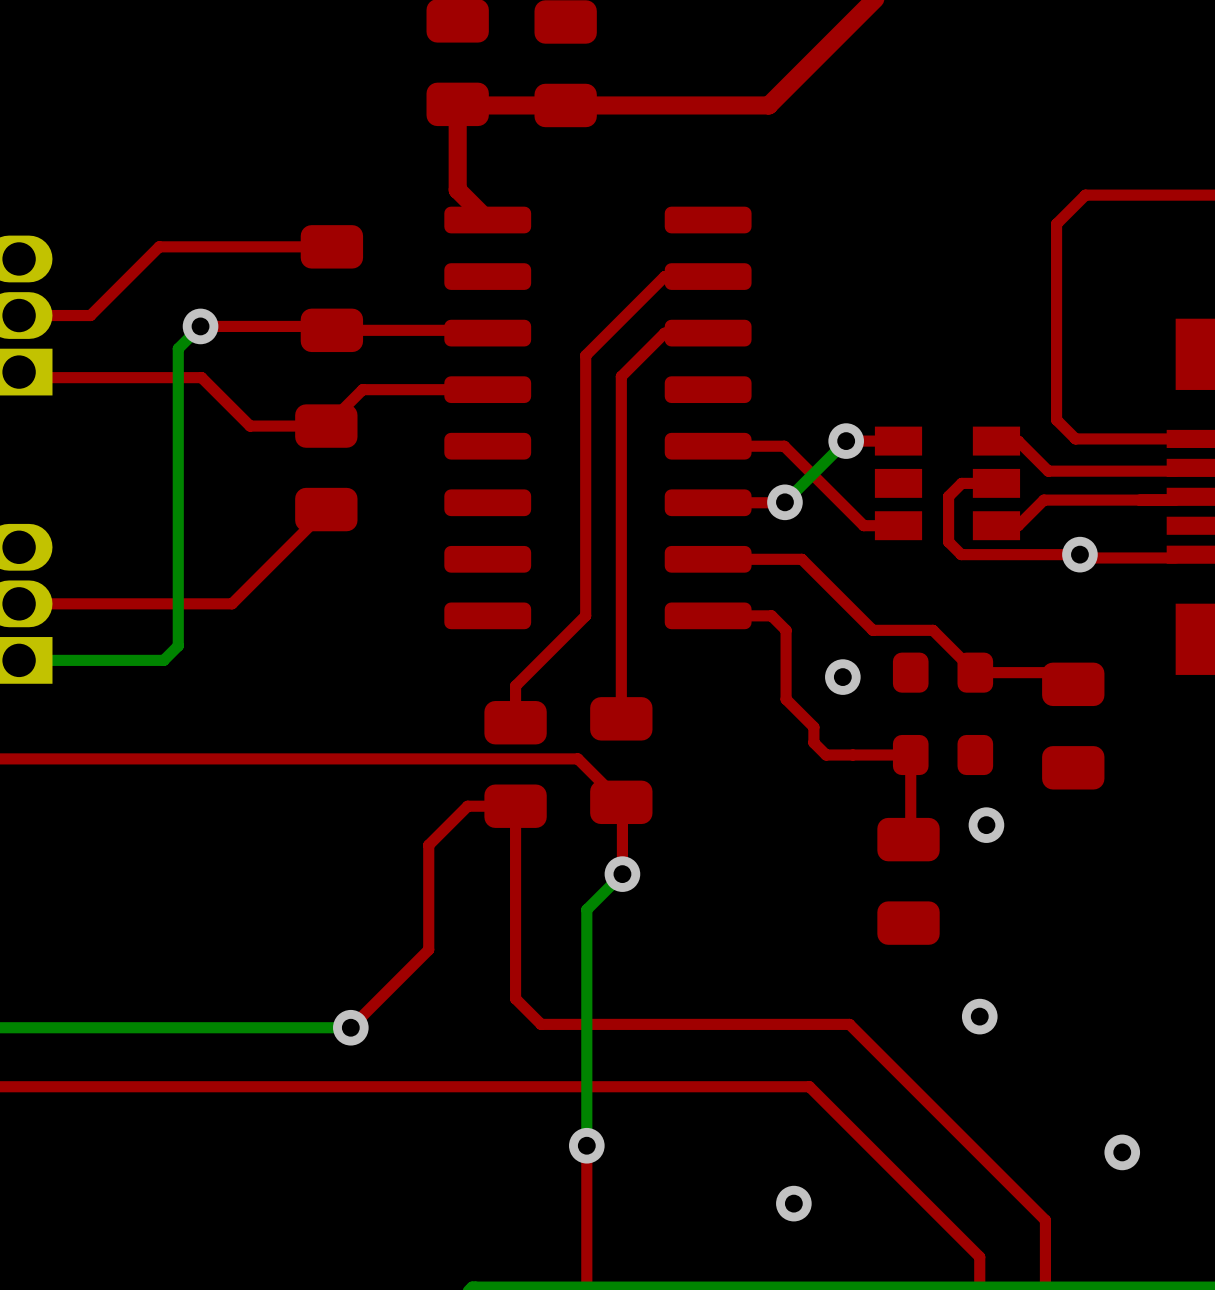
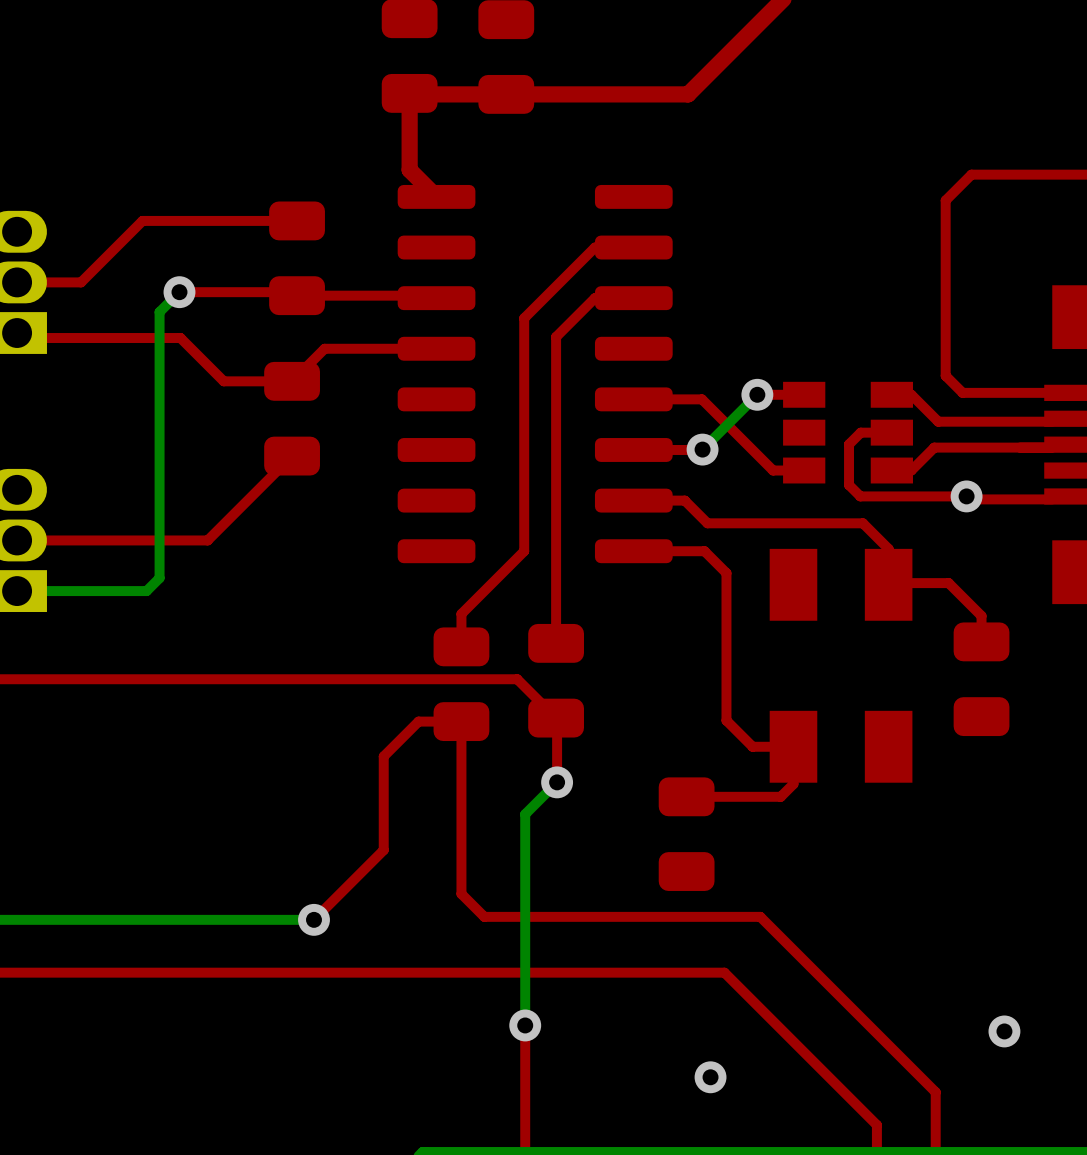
top track: (765, 559) (801, 559) (872, 630) (933, 630) (975, 672) (1061, 672) (1073, 684) -> (684, 500) (707, 523) (862, 523) (888, 548) (888, 584) (890, 583) (948, 583) (981, 615) (981, 641)
top track: (771, 615) (786, 630) (786, 699) (813, 727) (813, 742) (826, 755) (910, 755) (910, 837) (908, 839) -> (690, 551) (704, 551) (726, 573) (726, 720) (752, 746) (793, 746) (793, 784) (780, 796) (686, 796)
part footprint: [892, 652, 994, 776] -> [769, 548, 913, 783]
via: (842, 677) -> none
part position: (1073, 726) -> (981, 679)
via: (986, 825) -> none
part position: (908, 881) -> (686, 834)
via: (979, 1016) -> none

